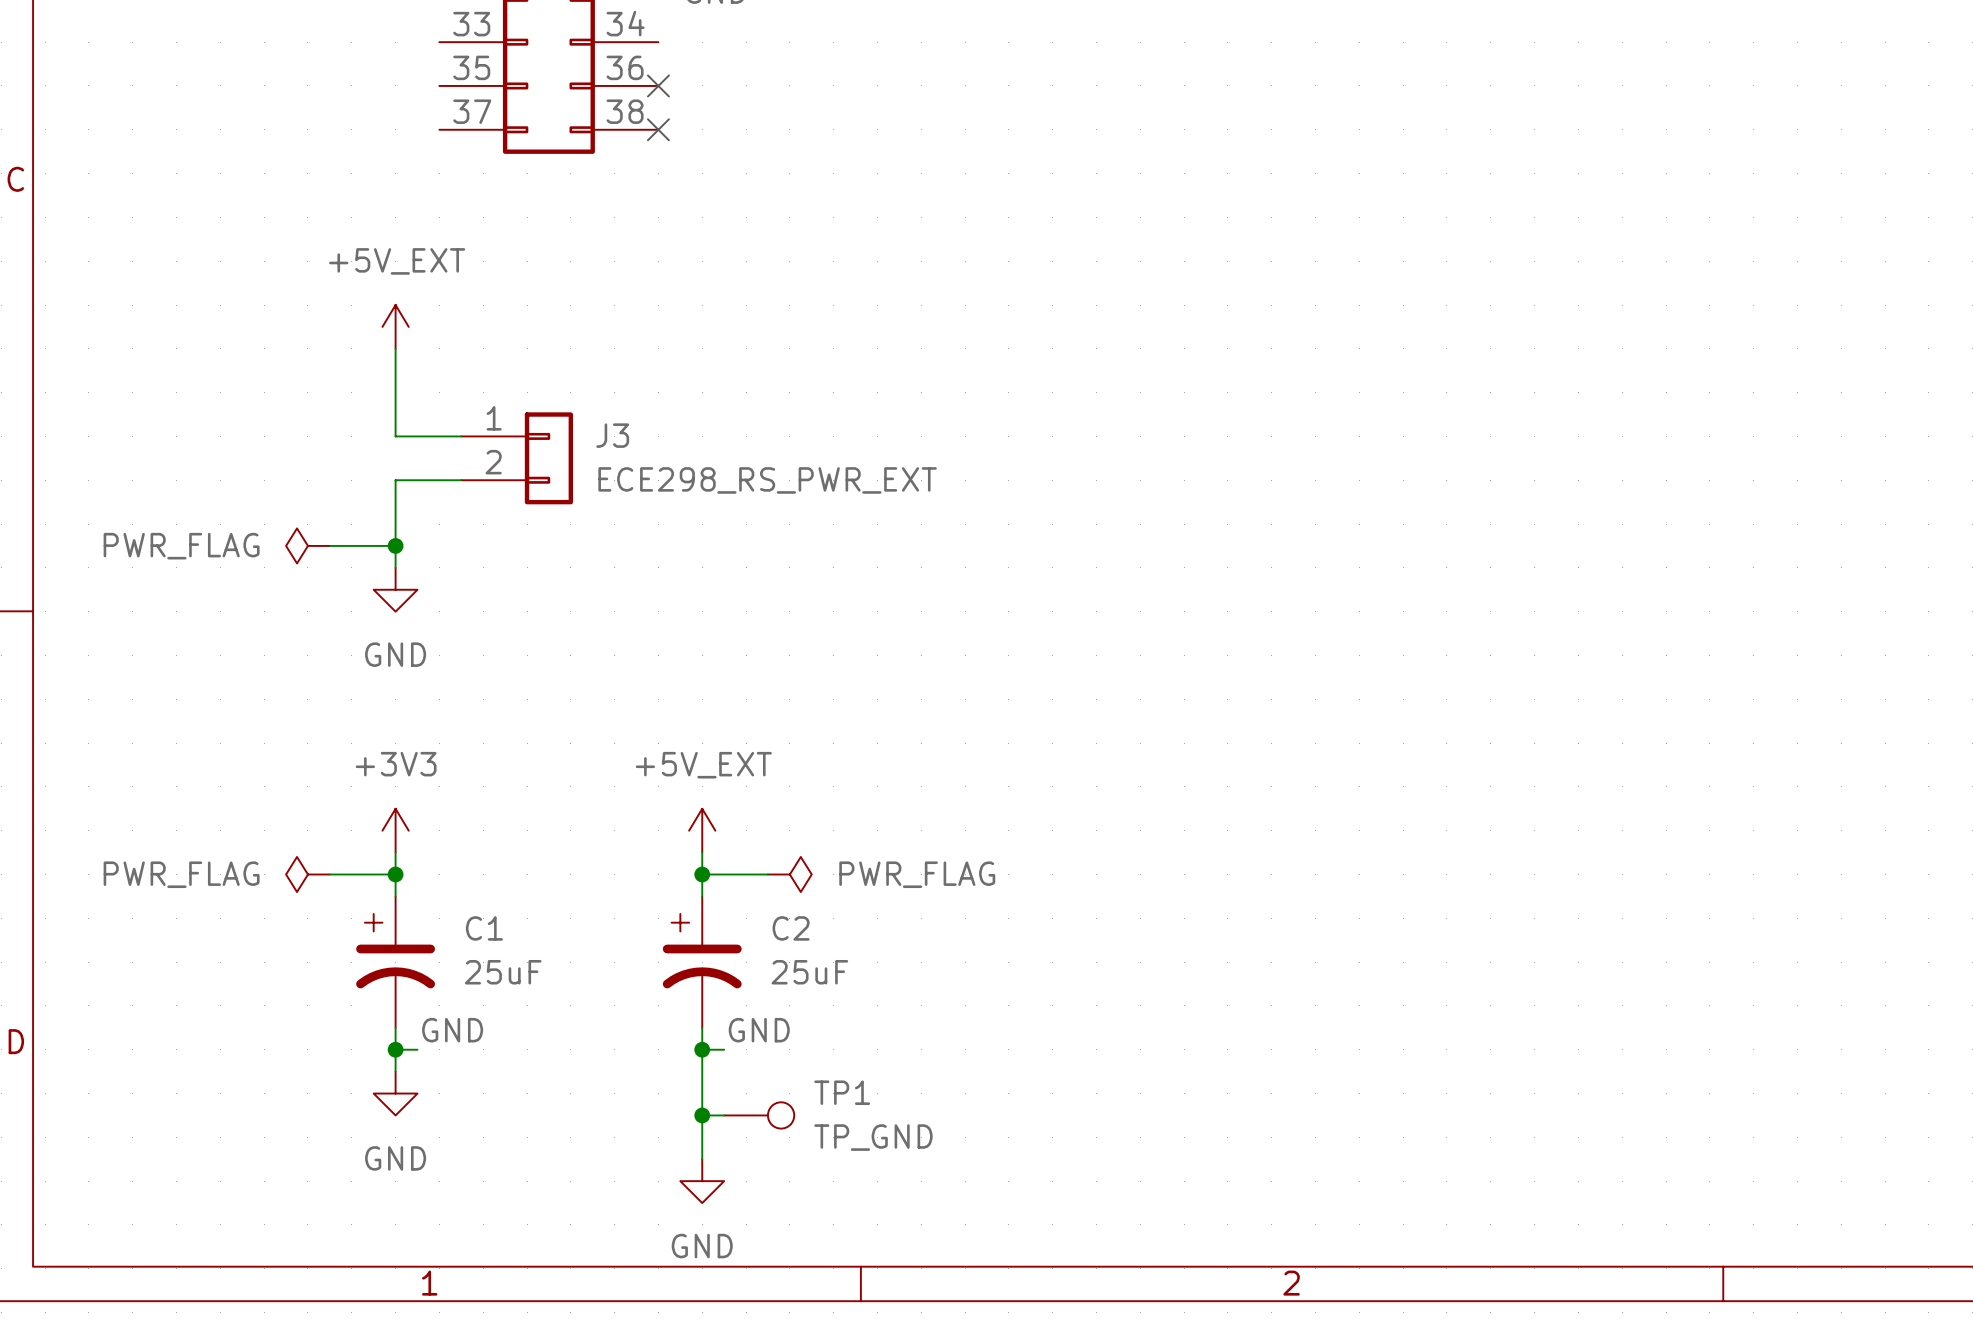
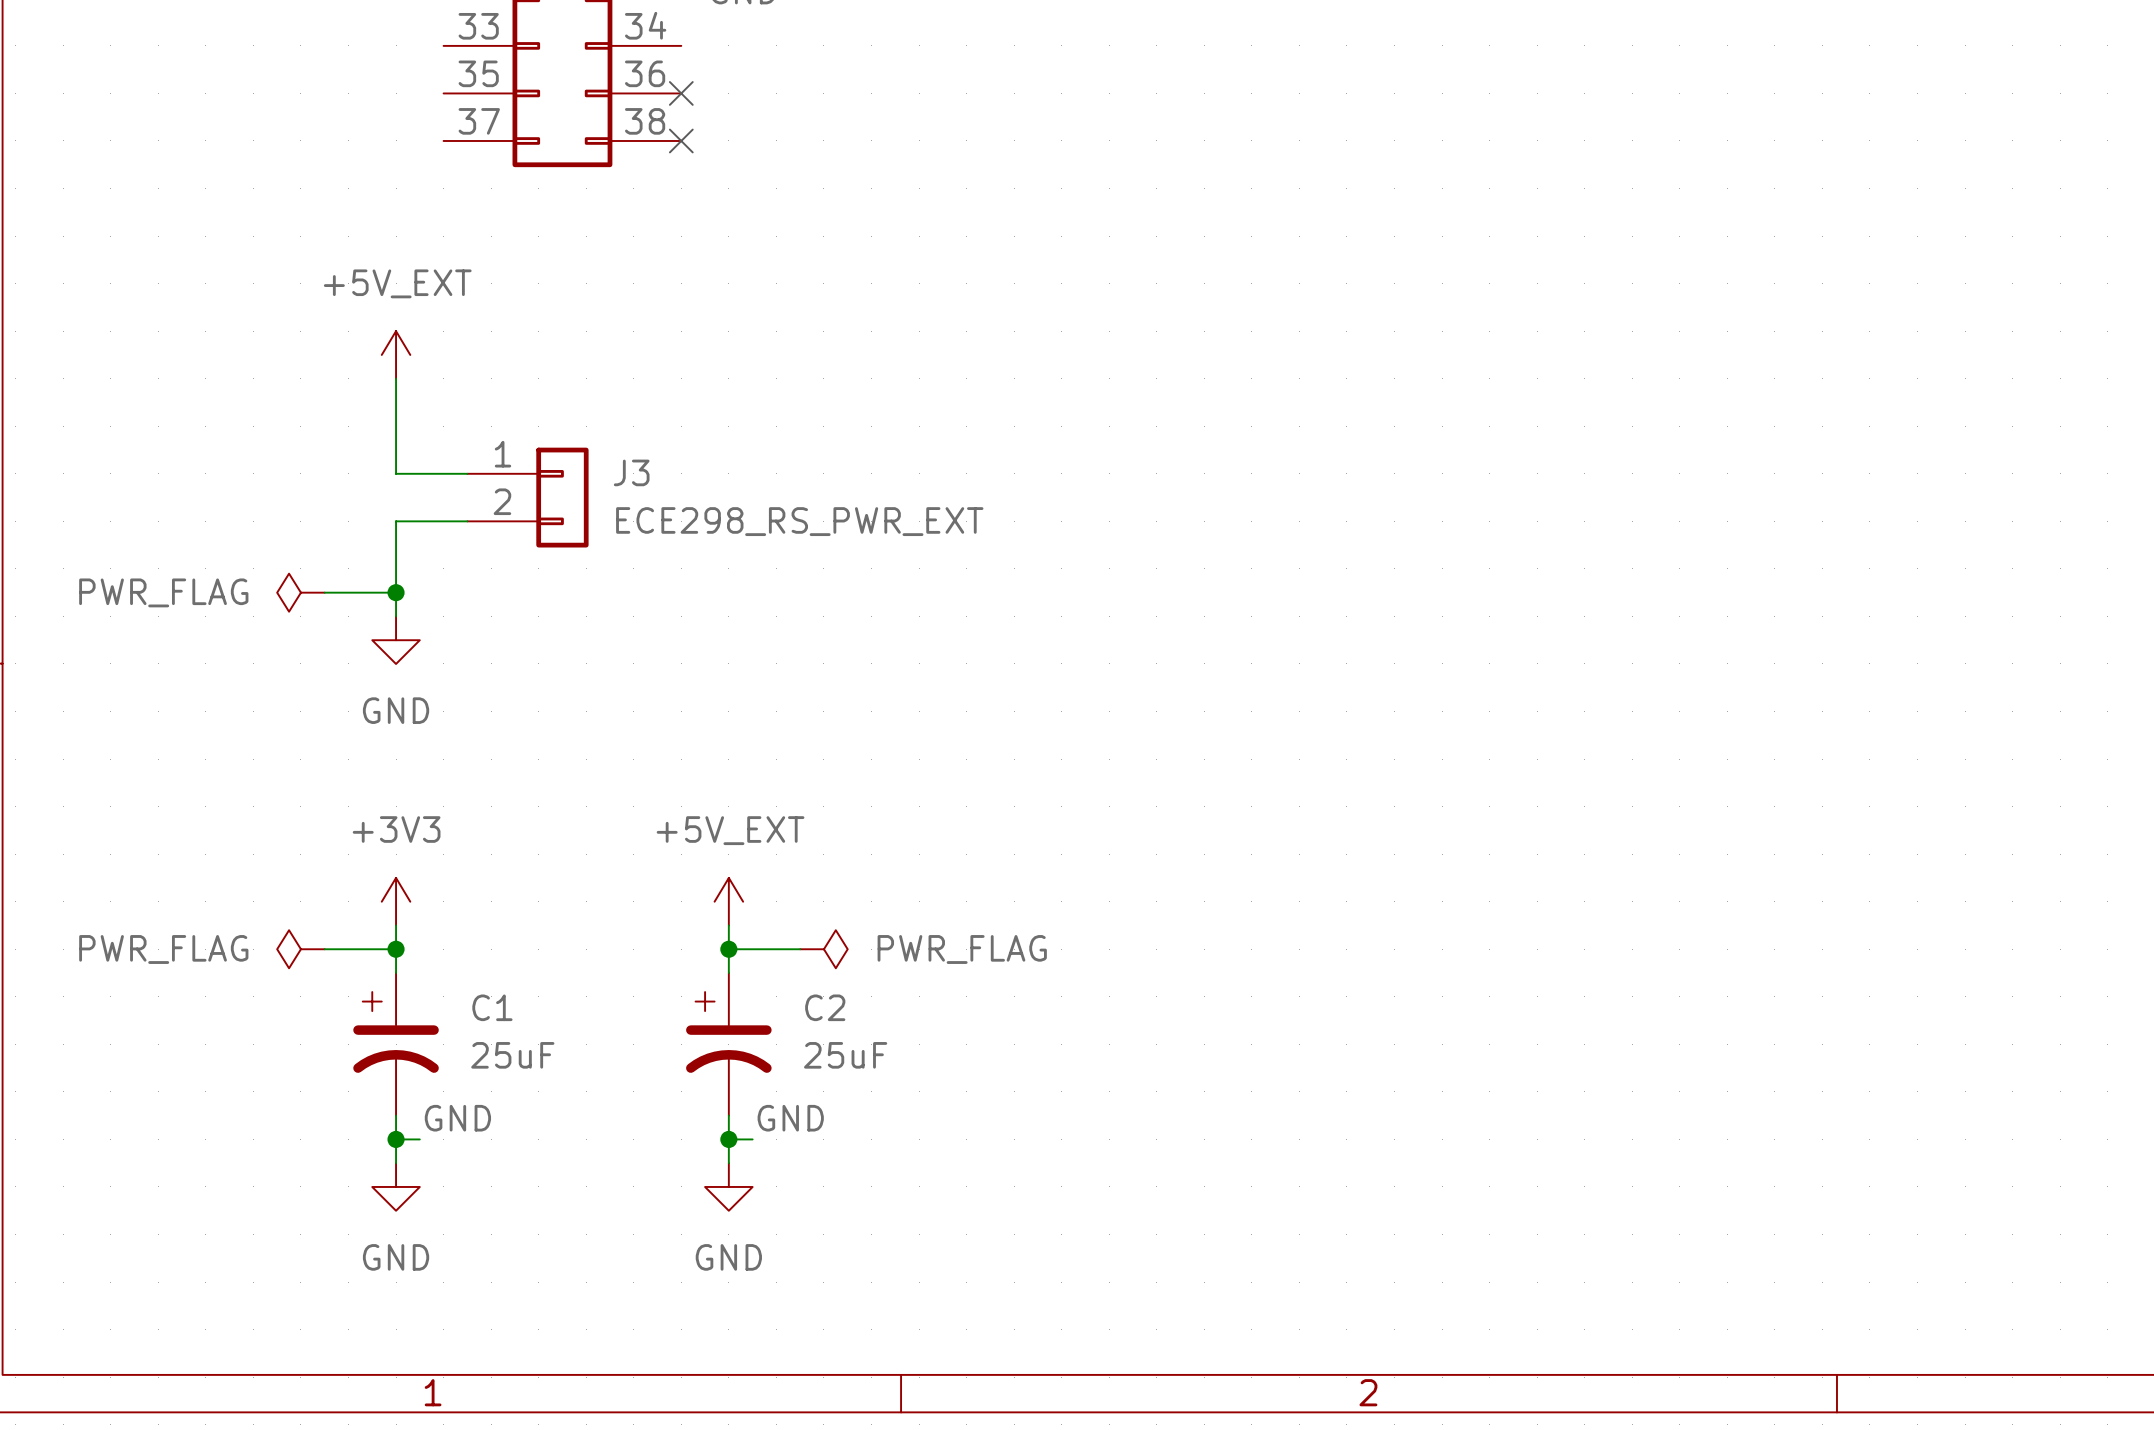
wire: (702, 1071) (702, 1159) -> none
wire: (702, 1115) (724, 1115) -> none
junction: (702, 1115) -> none
TP1: TP_GND (759, 1115) -> none
power symbol position: GND (702, 1181) -> GND (728, 1186)

